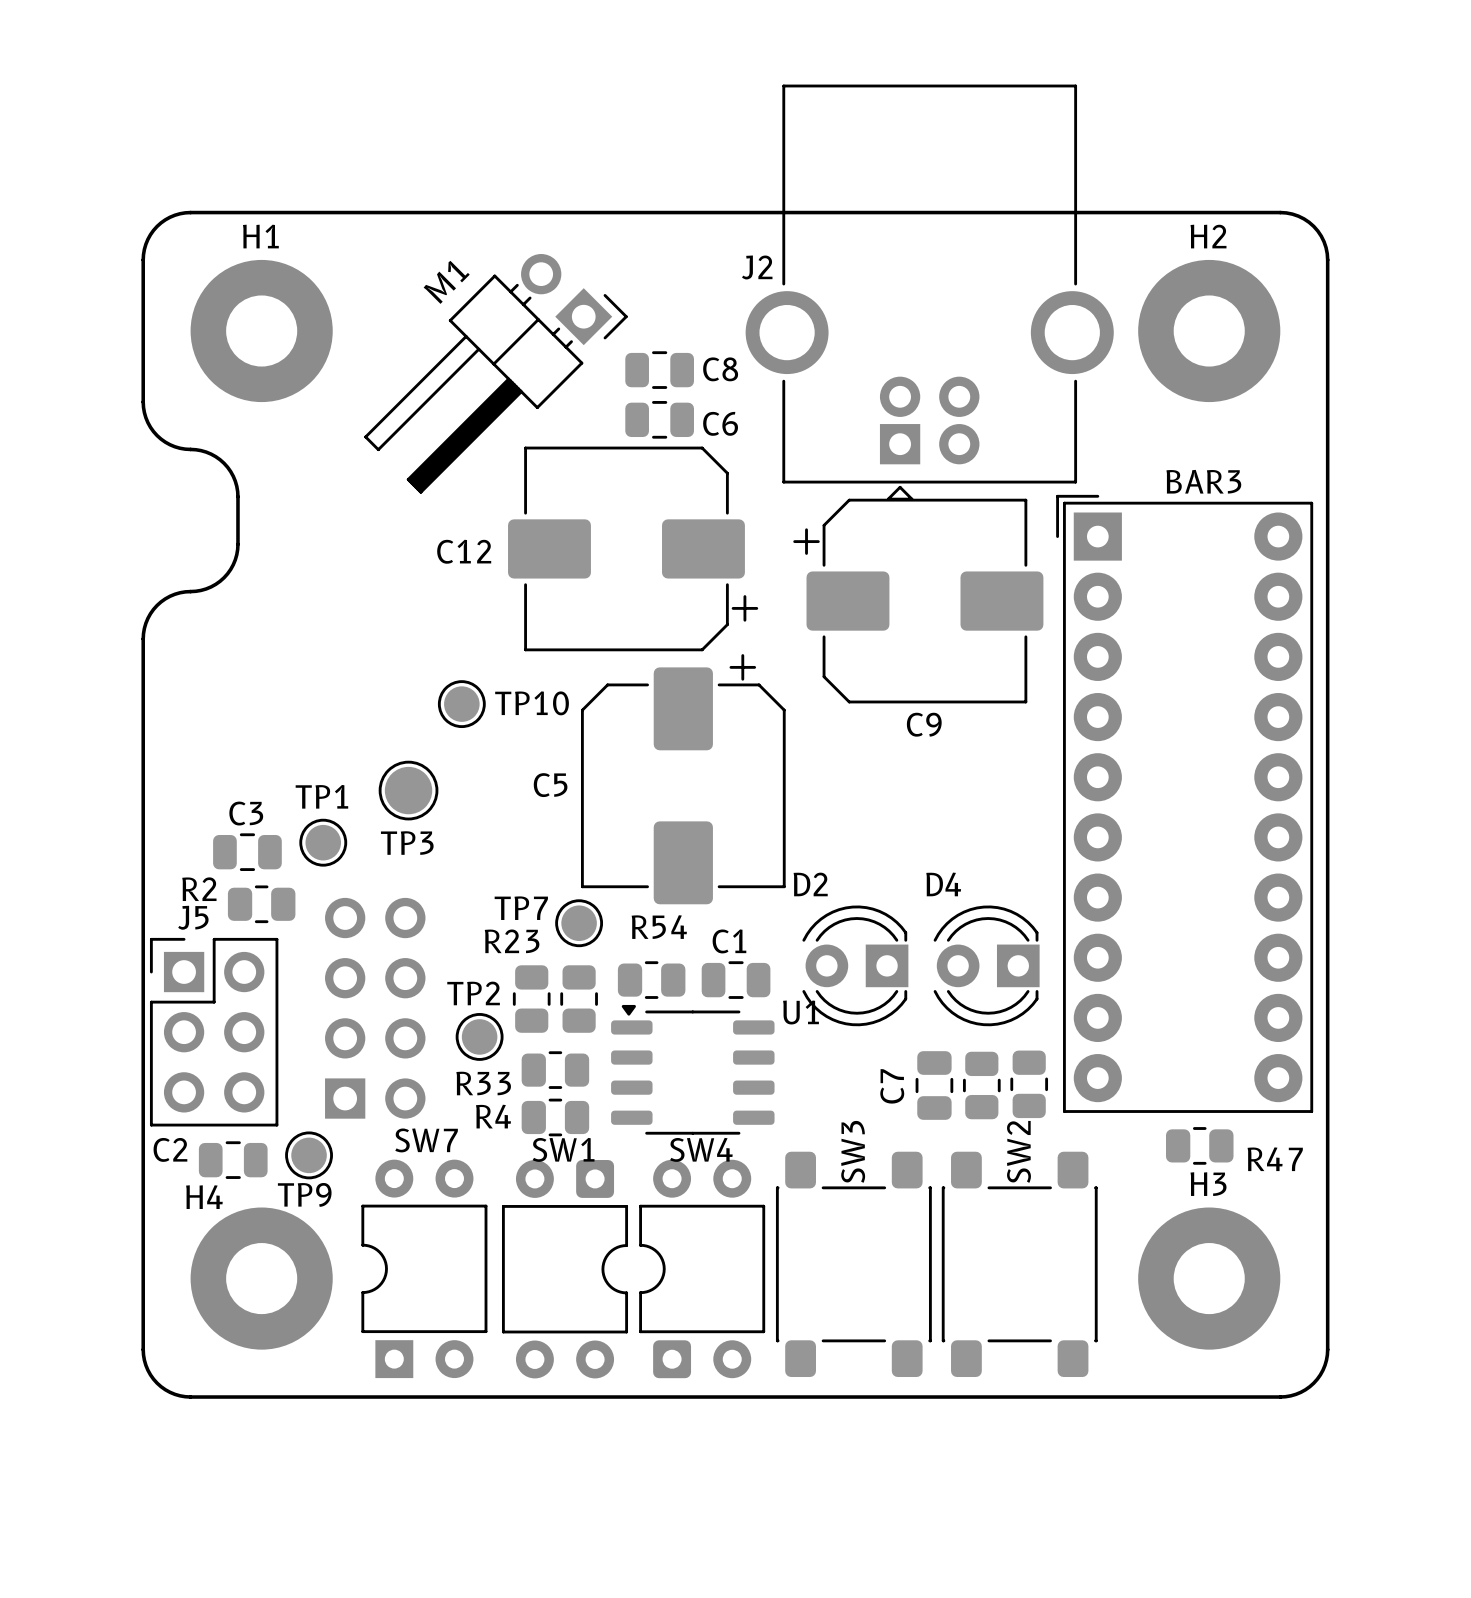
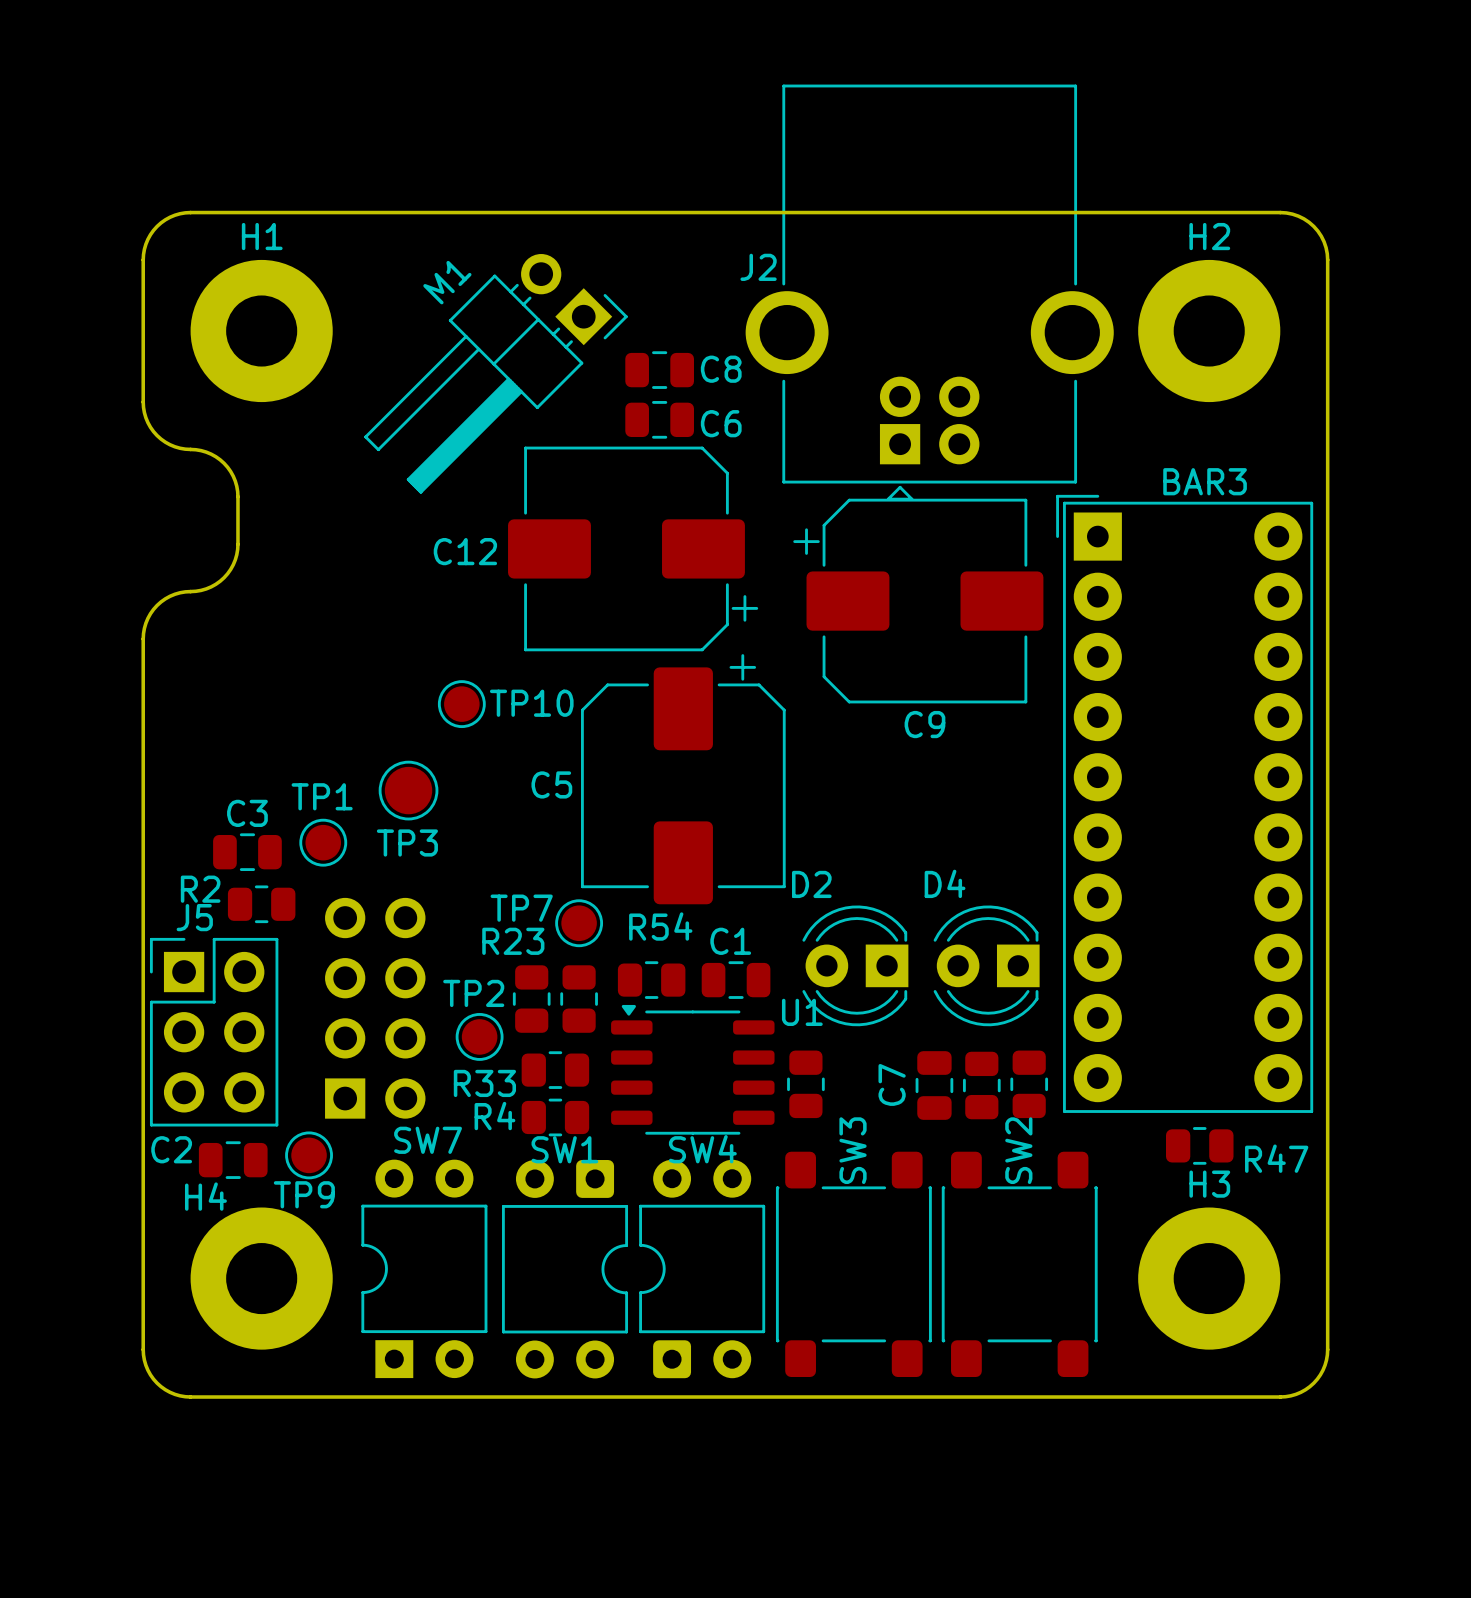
part: none -> (805, 1084)

